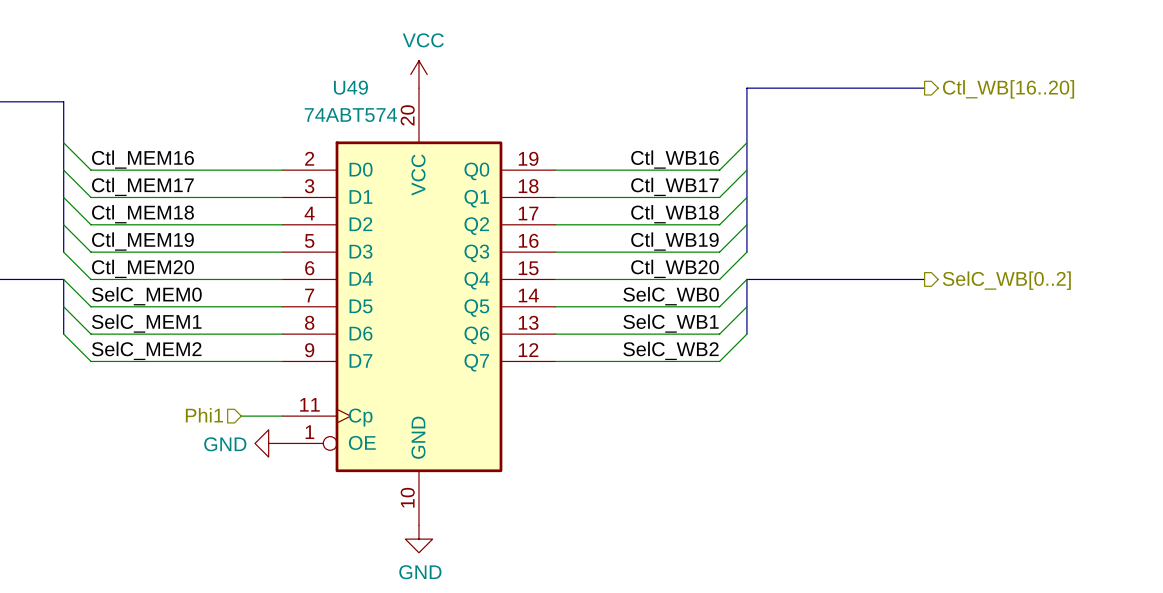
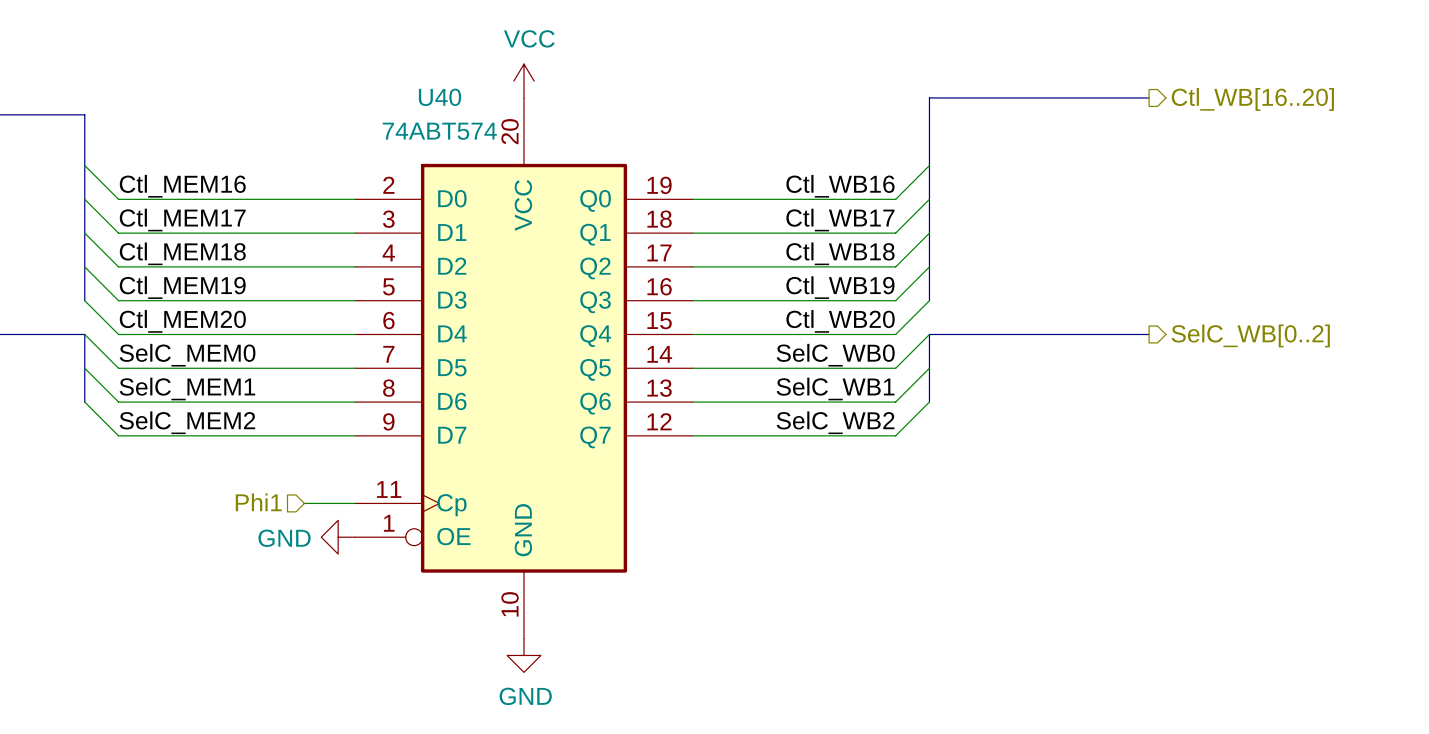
U49 name: U49 (350, 87) -> U40 (440, 97)

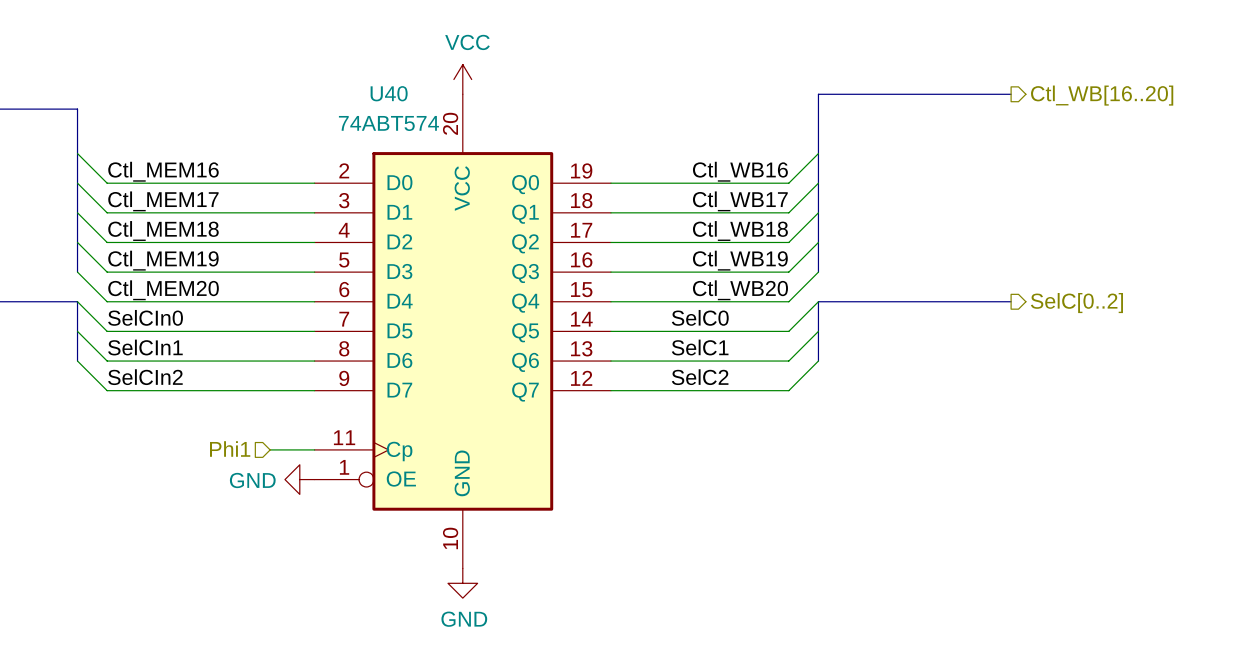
hierarchical label: SelC_WB[0..2] (1250, 335) -> SelC[0..2] (1076, 303)
label: none -> SelC0 (700, 317)
label: SelC_MEM0 (187, 355) -> SelCIn0 (145, 317)
label: SelC_WB0 (835, 355) -> none
label: none -> SelC1 (700, 347)
label: SelC_MEM1 (187, 388) -> SelCIn1 (145, 347)
label: SelC_WB1 (835, 388) -> none
label: none -> SelC2 (700, 377)
label: SelC_MEM2 (187, 422) -> SelCIn2 (145, 377)
label: SelC_WB2 (835, 422) -> none

